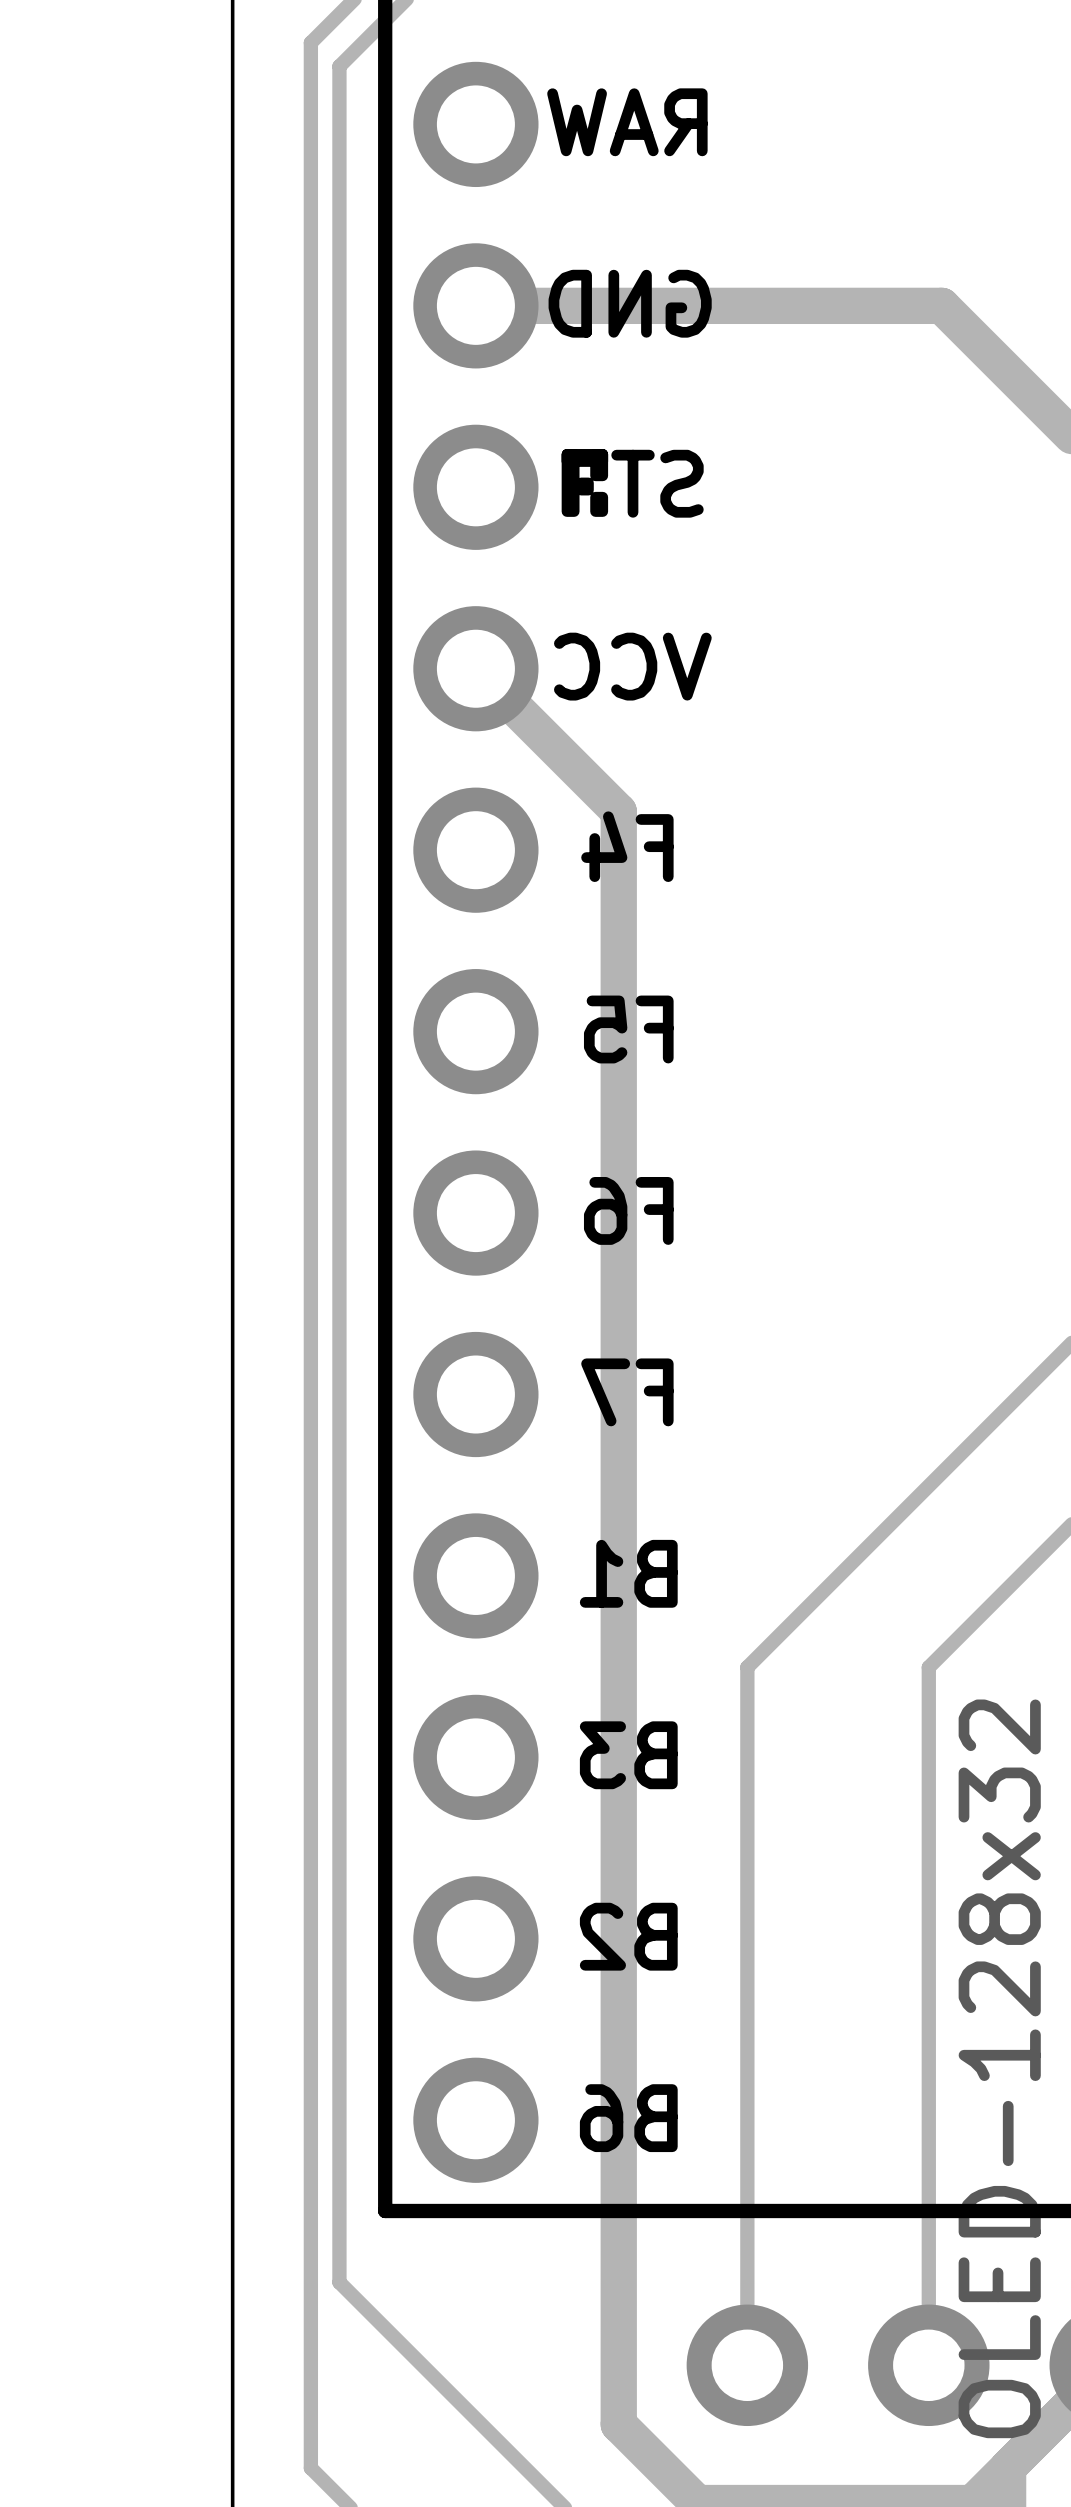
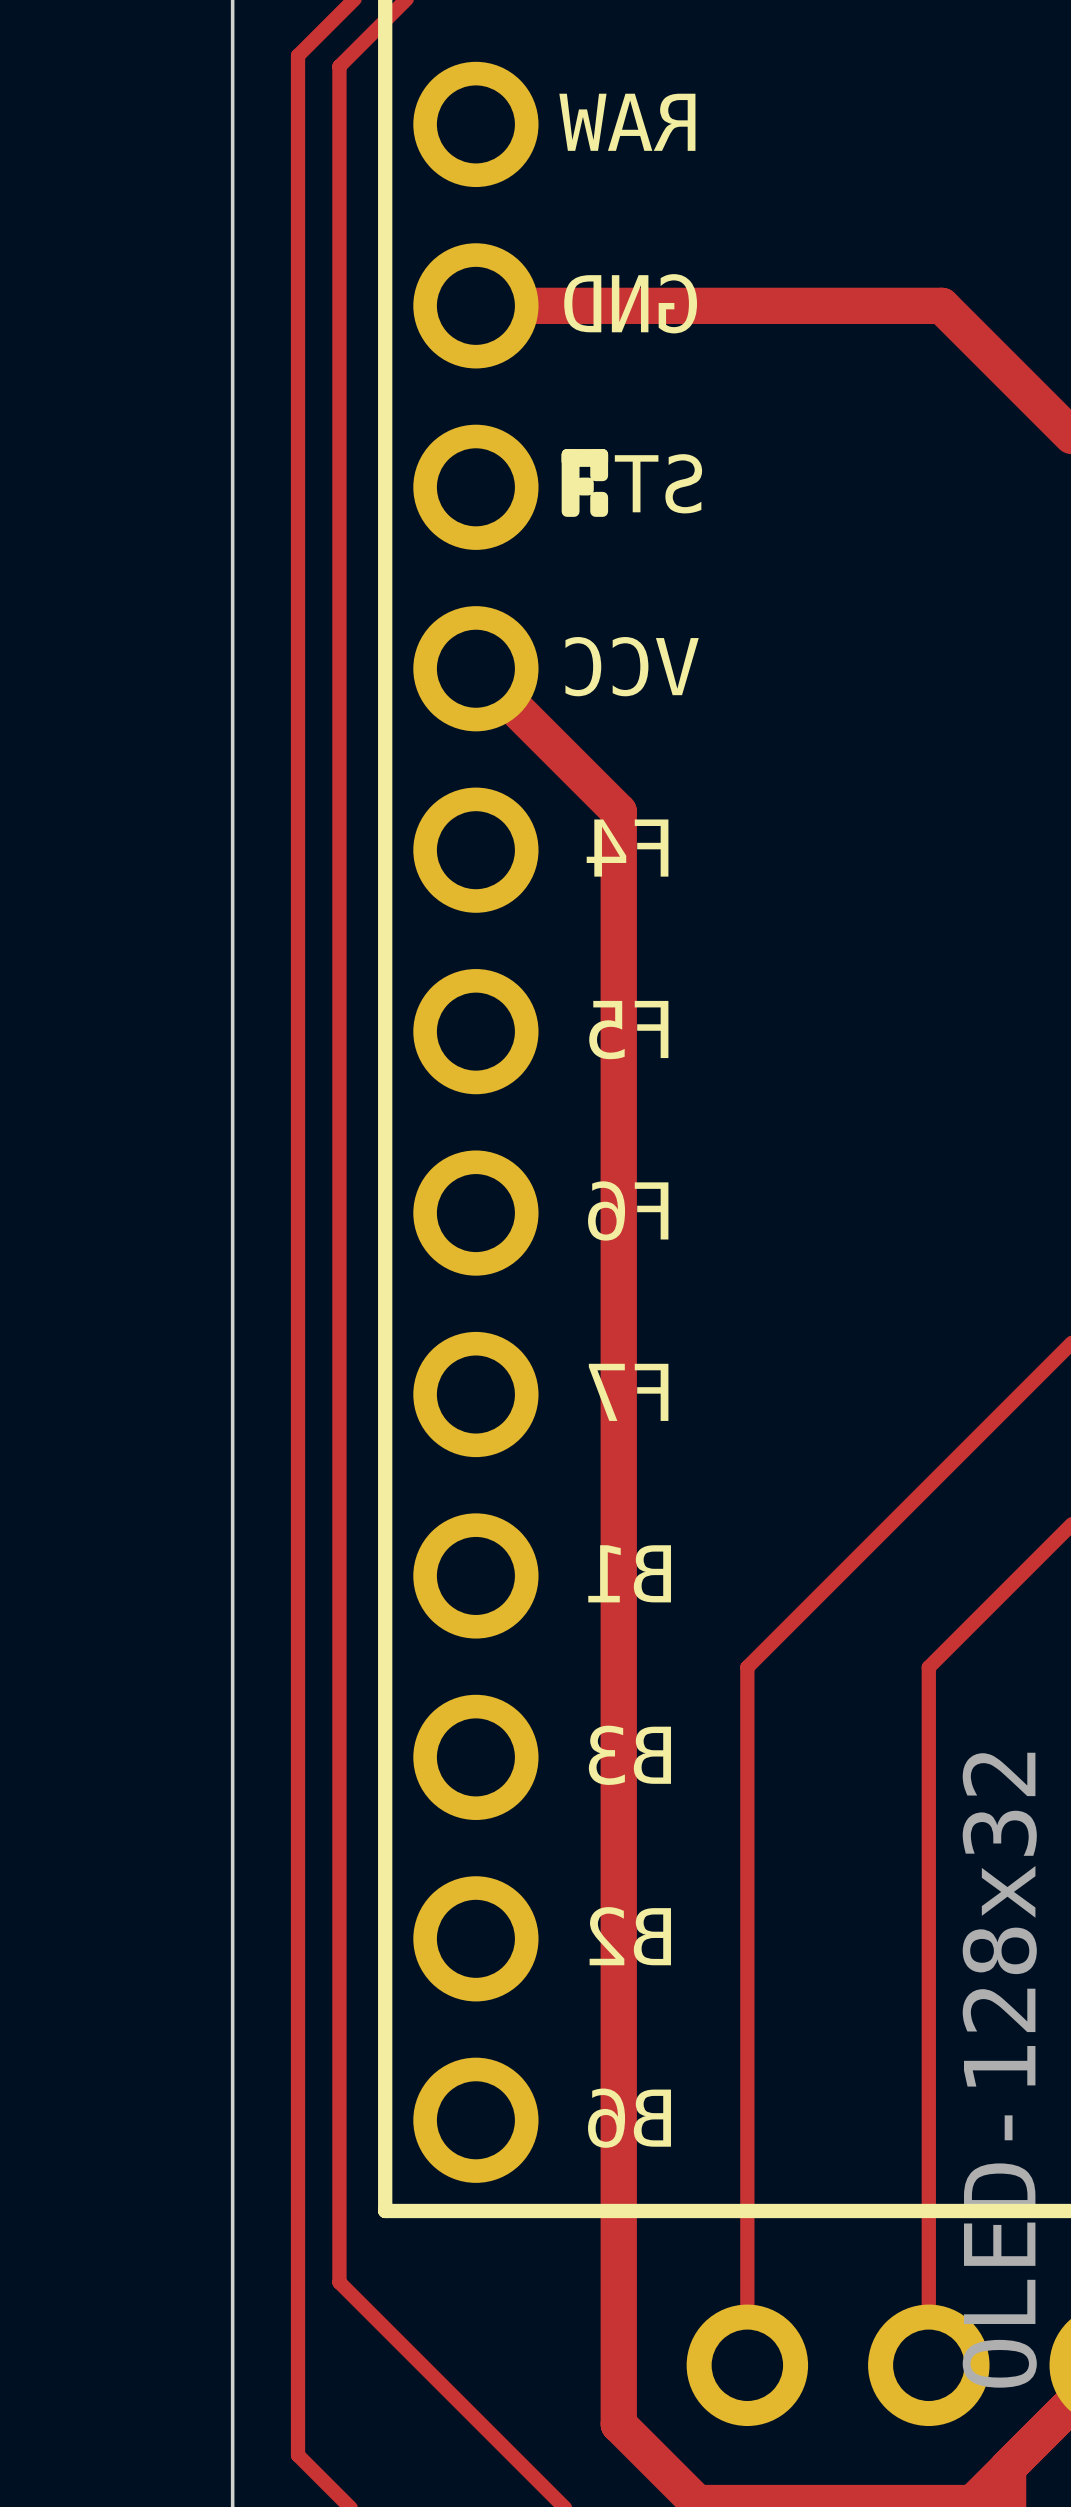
track: (310, 42) (310, 2468) -> (310, 42) (298, 55) (298, 2455) (310, 2468)

